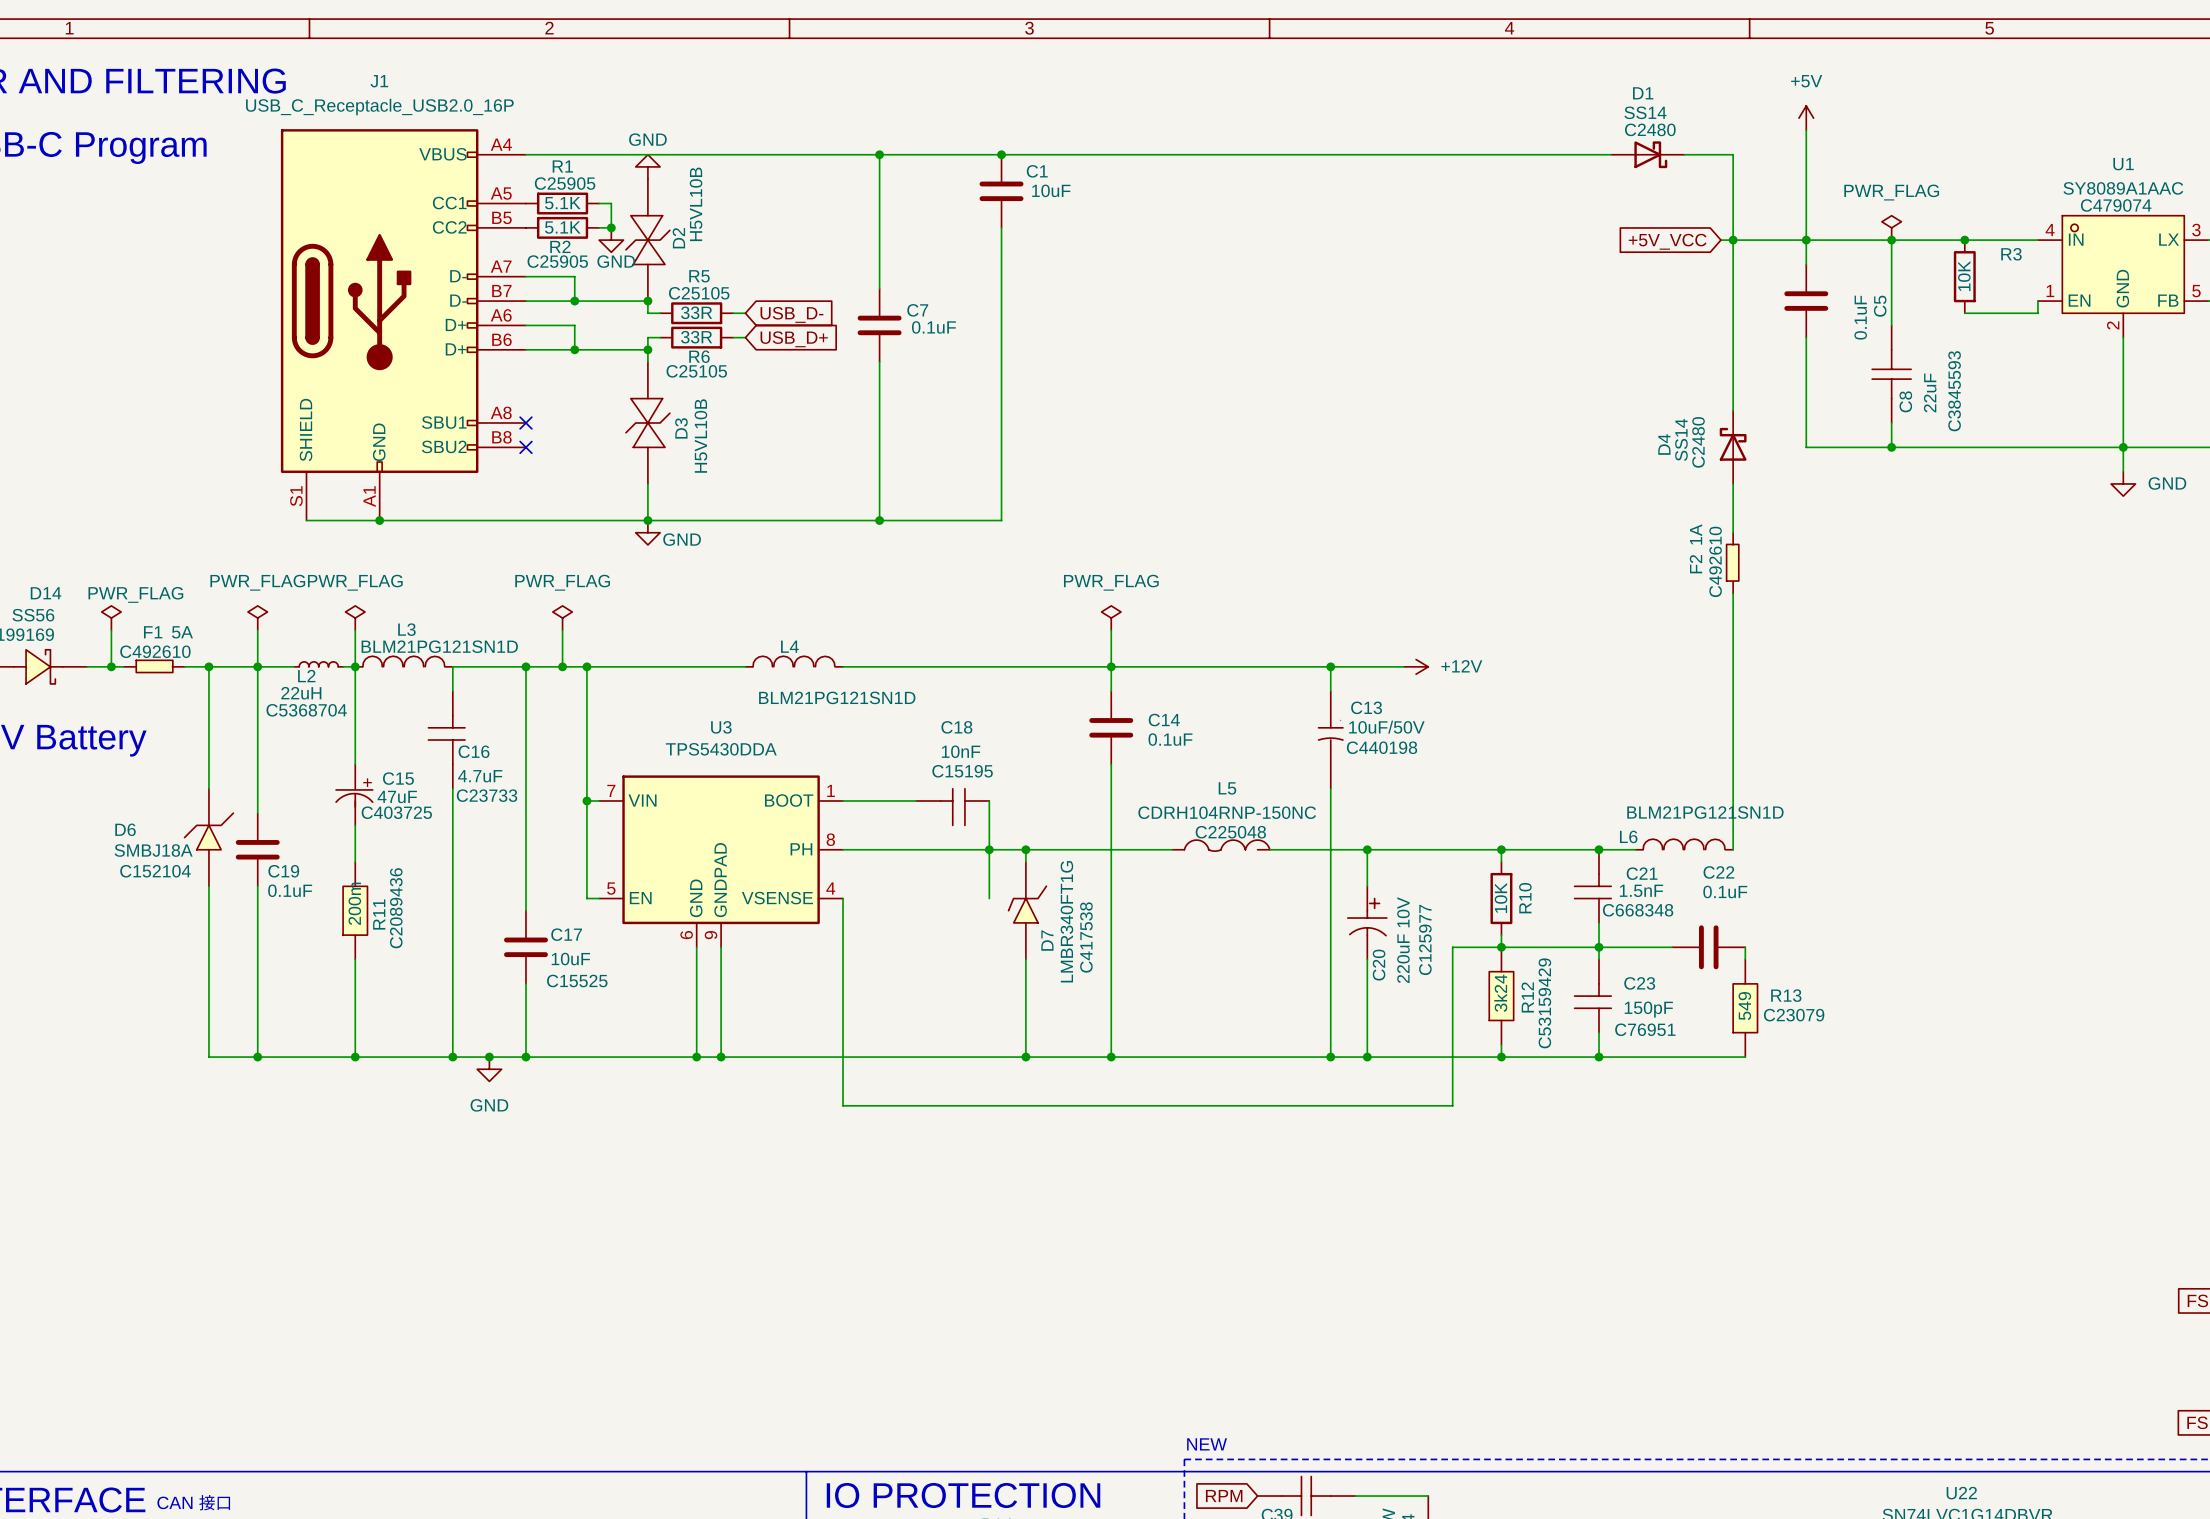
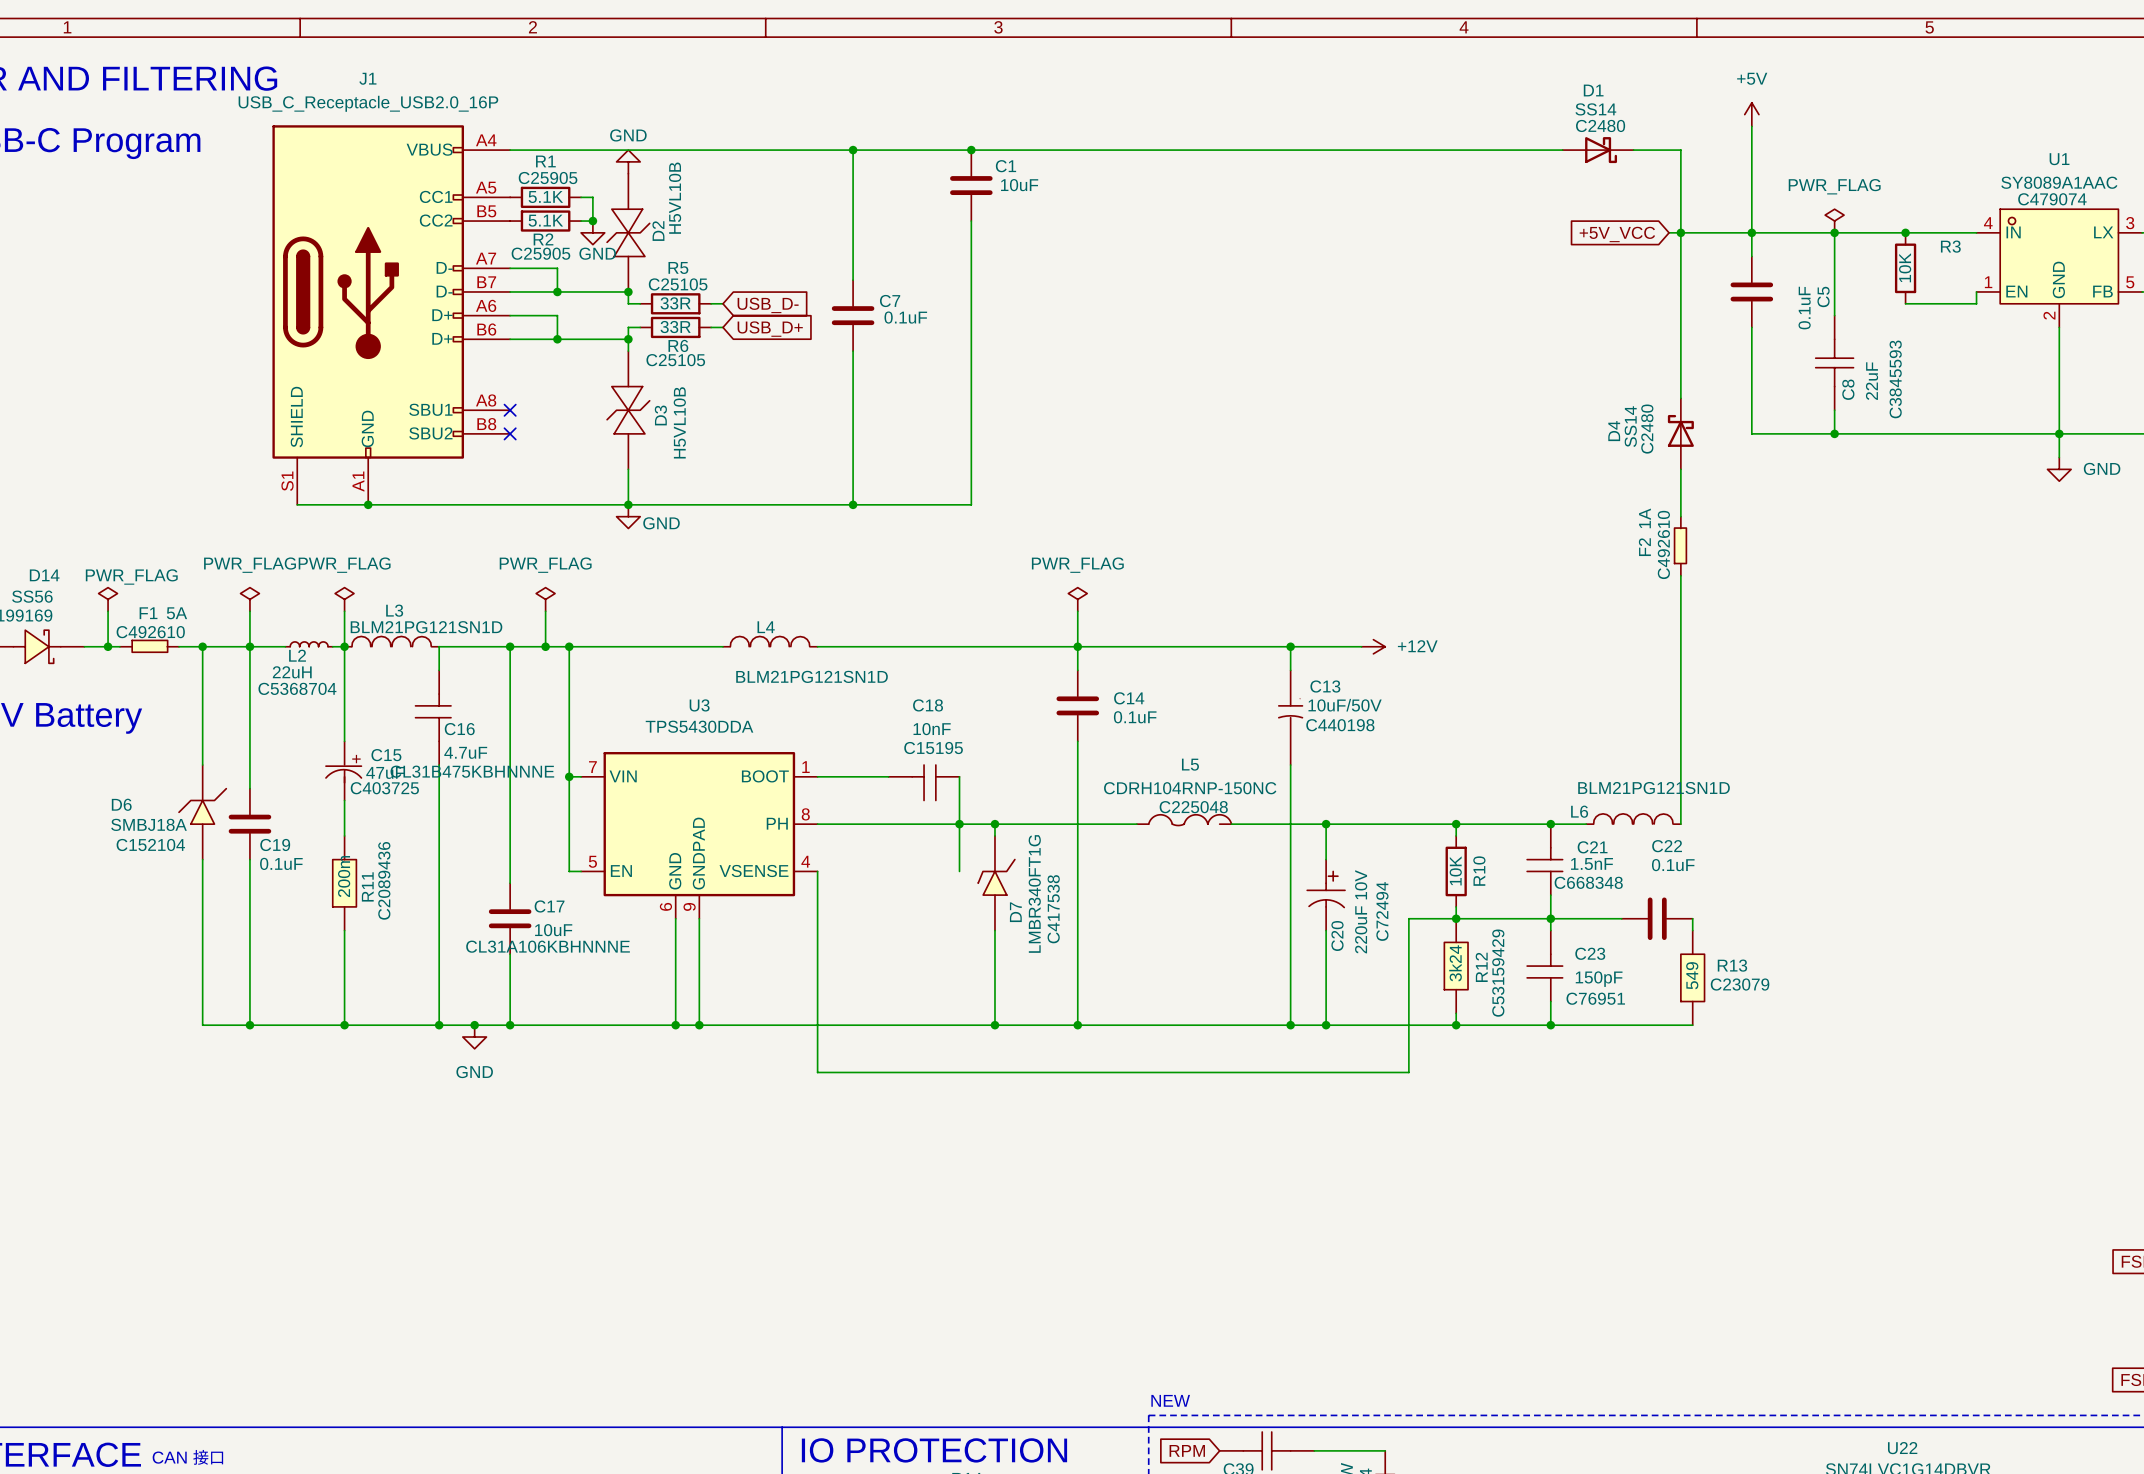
C16 text: C23733 (487, 795) -> CL31B475KBHNNNE (472, 771)
C20 text: C125977 (1425, 939) -> C72494 (1382, 911)
C17 text: C15525 (577, 980) -> CL31A106KBHNNNE (548, 946)

